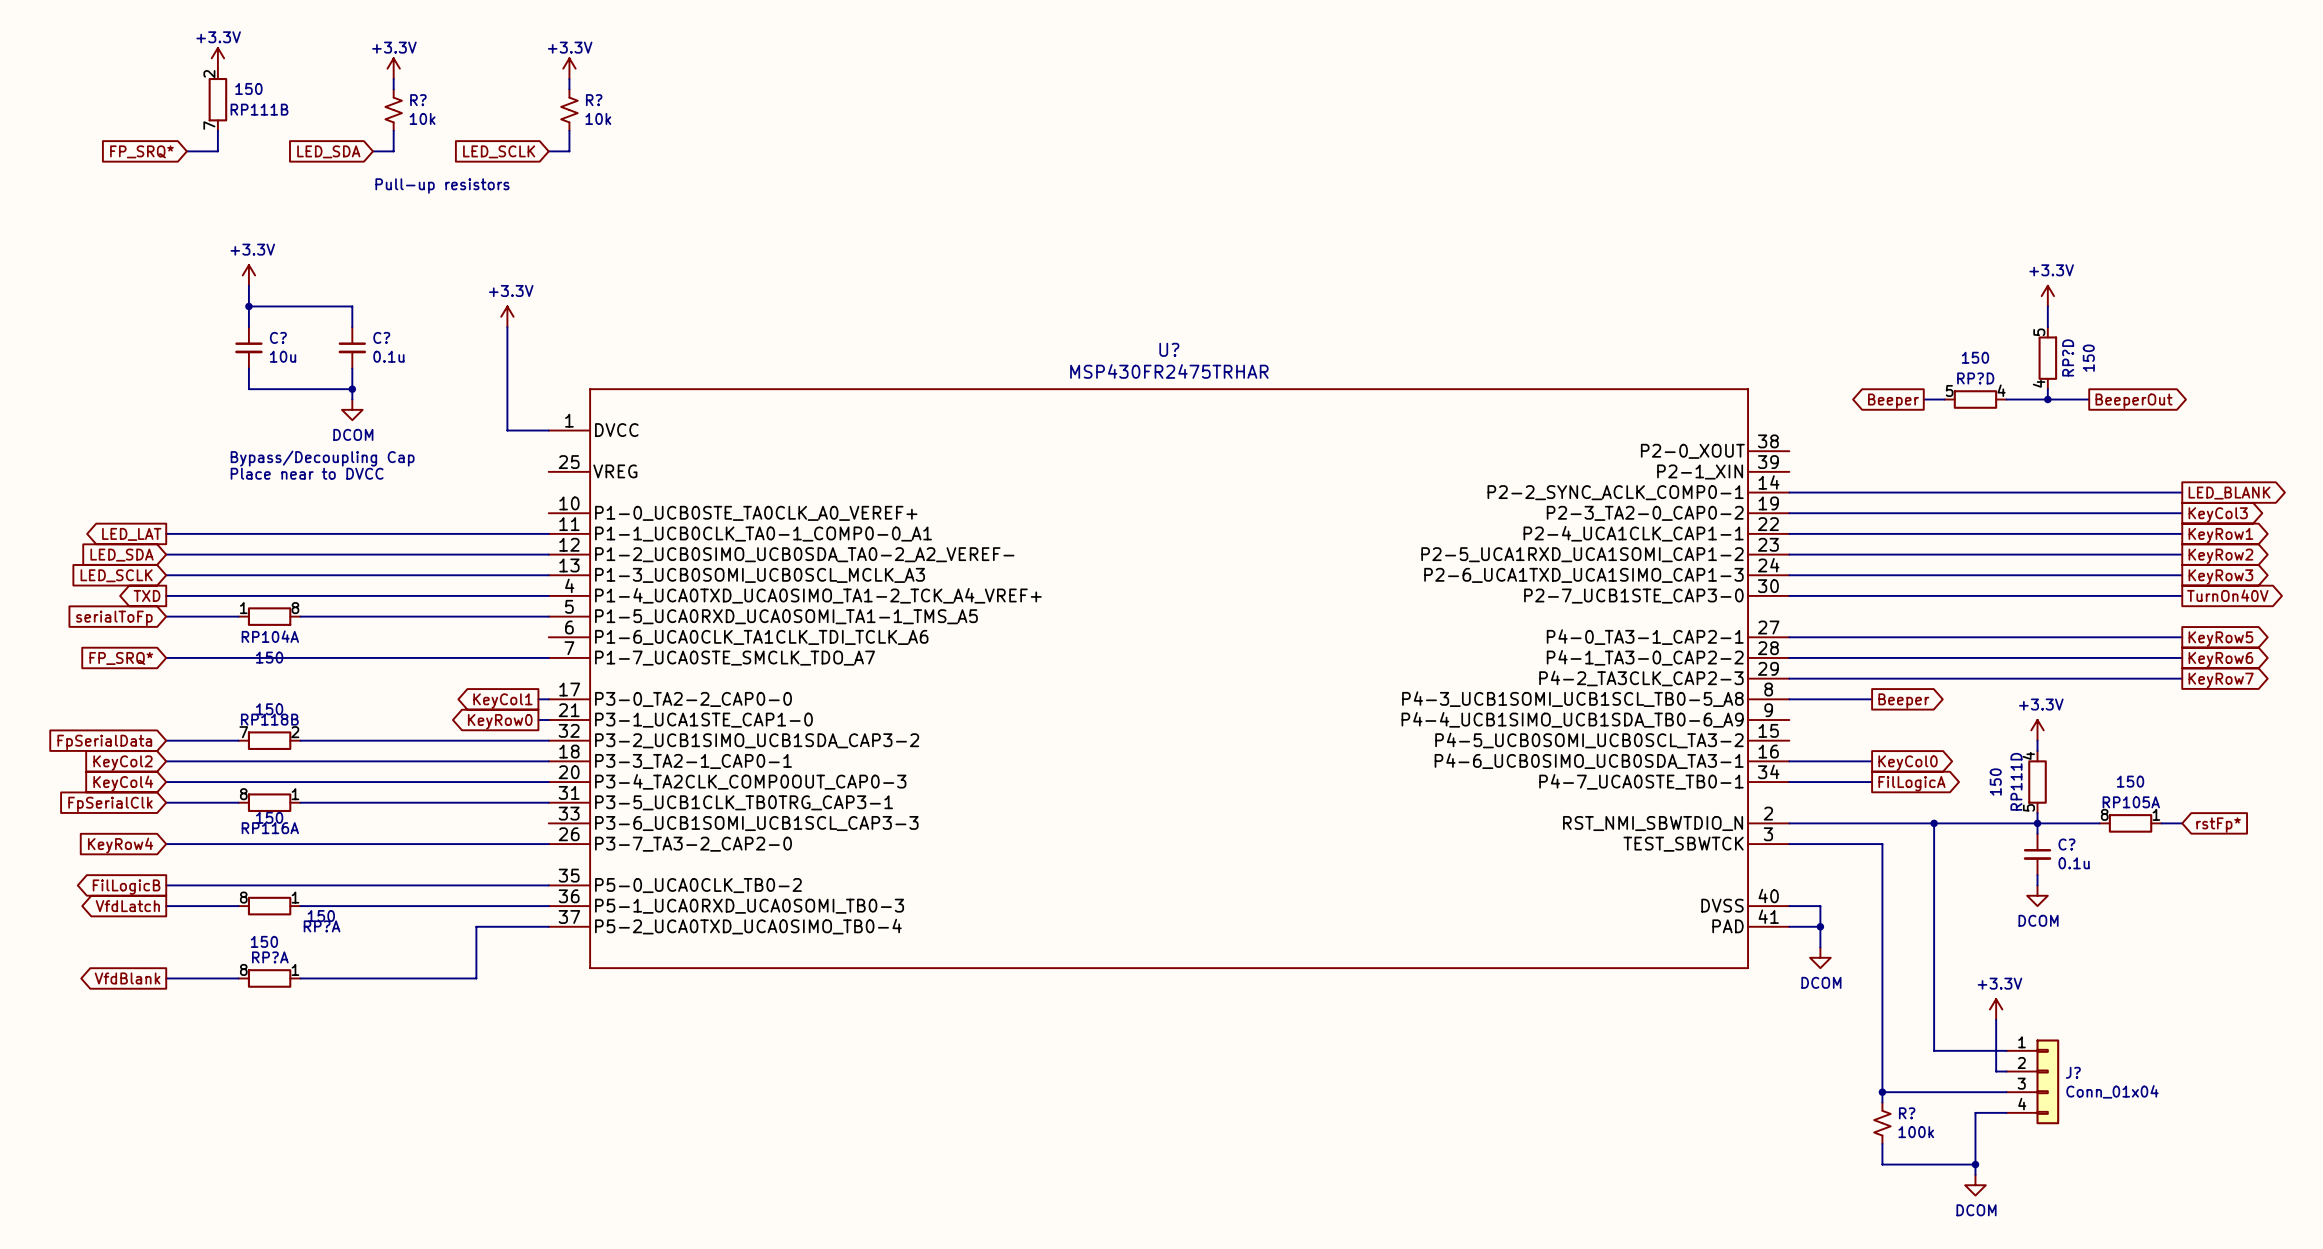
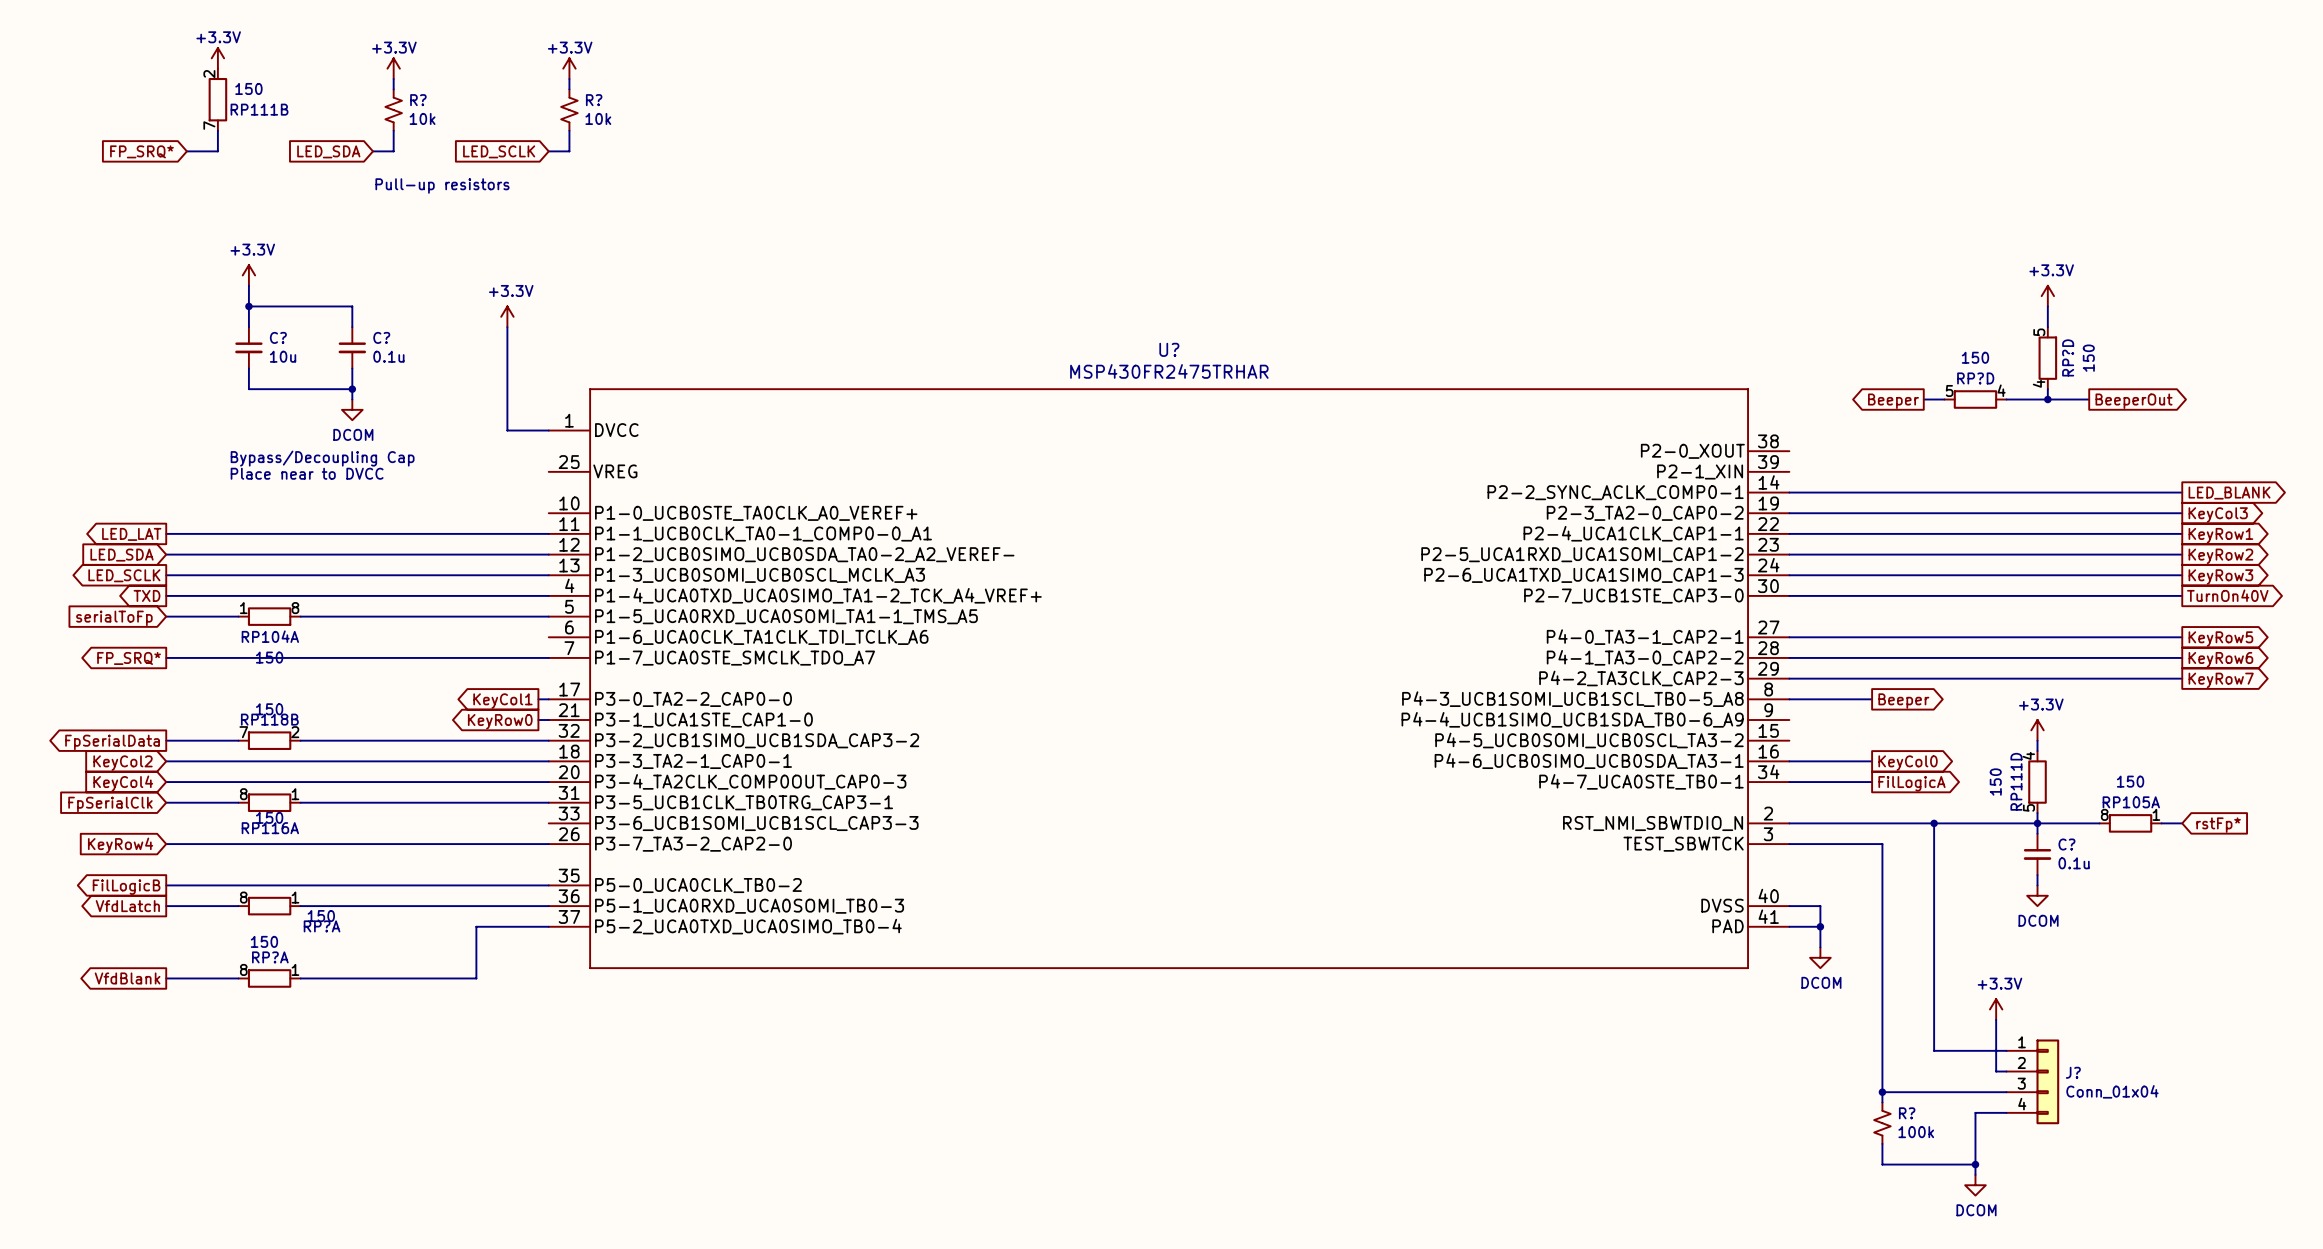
global label shape: input (116, 575) -> output (124, 575)
global label shape: input (121, 658) -> output (129, 658)
global label shape: input (104, 742) -> output (112, 742)

